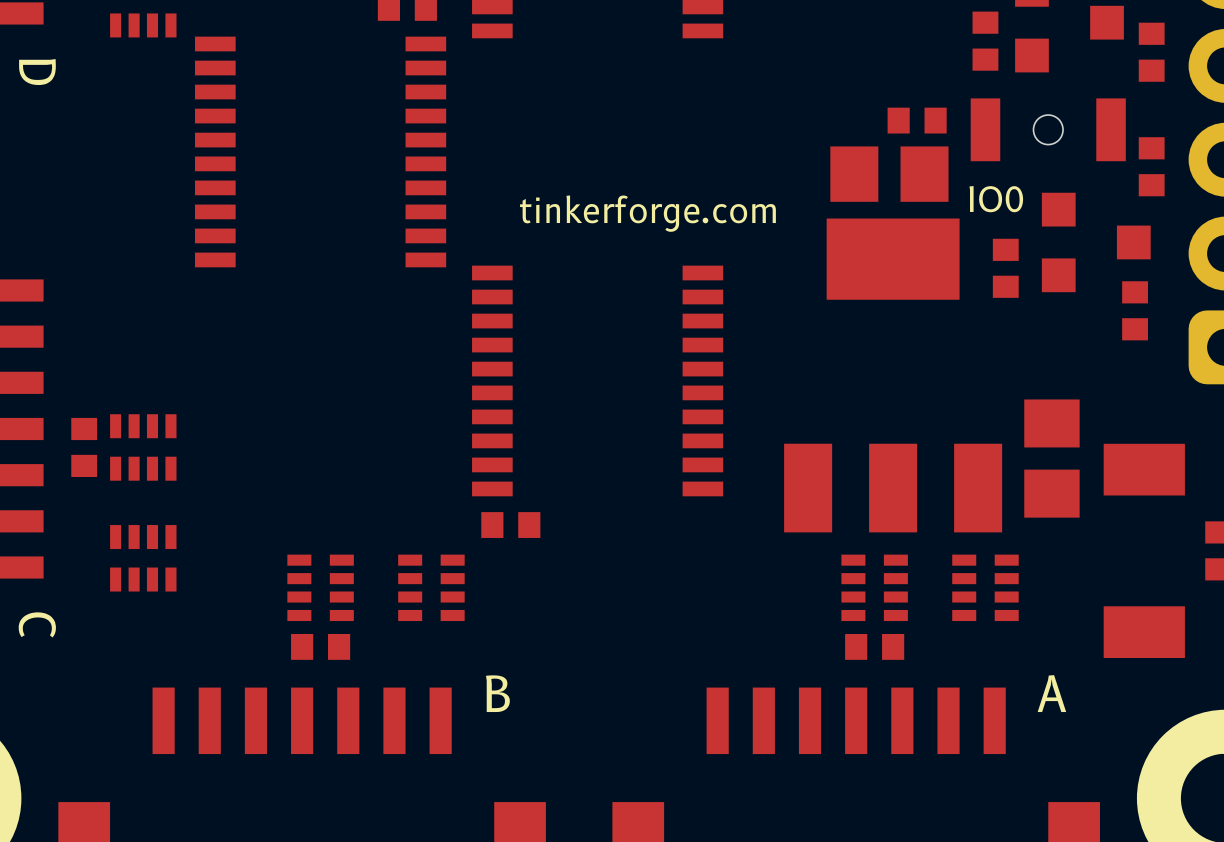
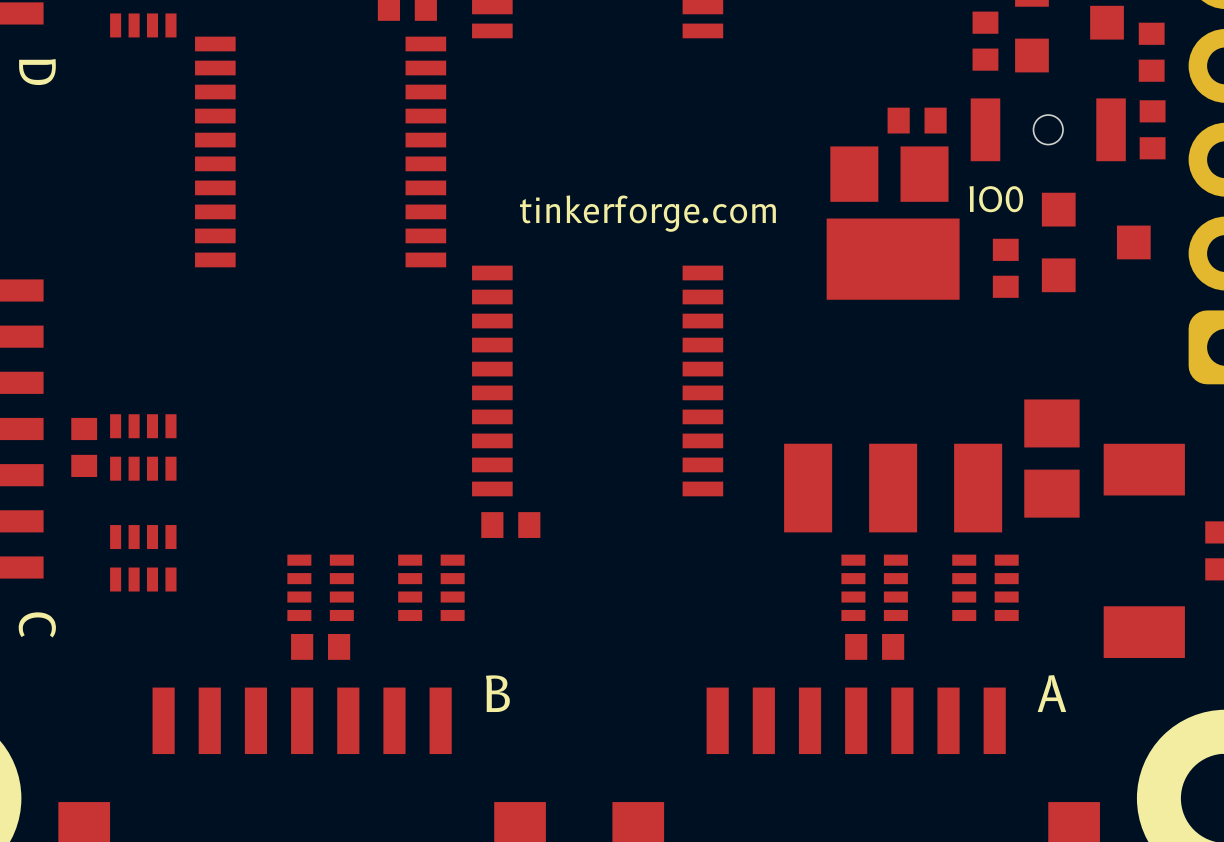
part position: (1151, 166) -> (1152, 129)
part: (1135, 310) -> none

